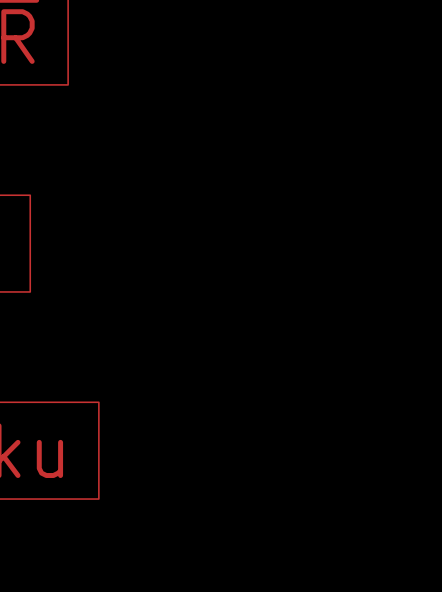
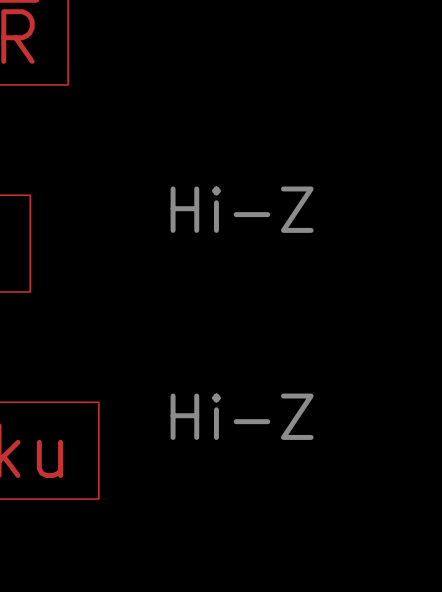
text: none -> Hi-Z (242, 209)
text: none -> Hi-Z (242, 416)

